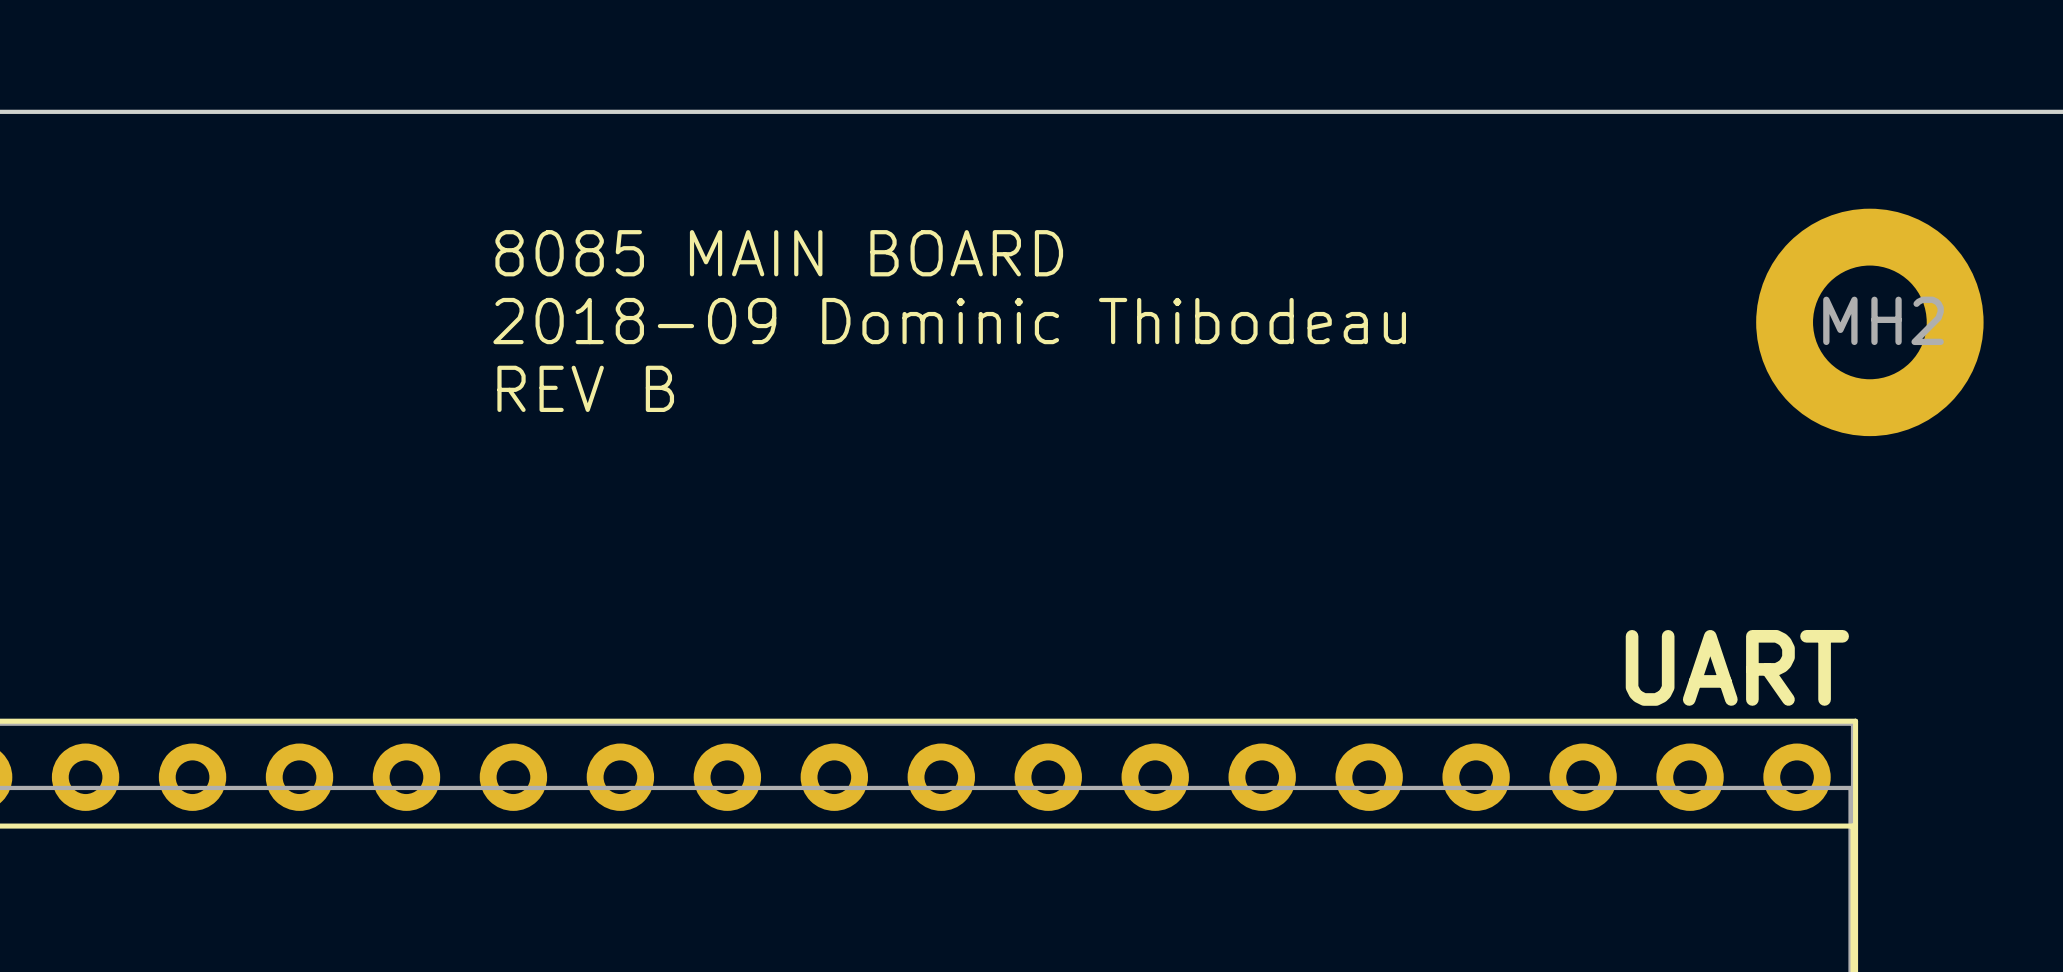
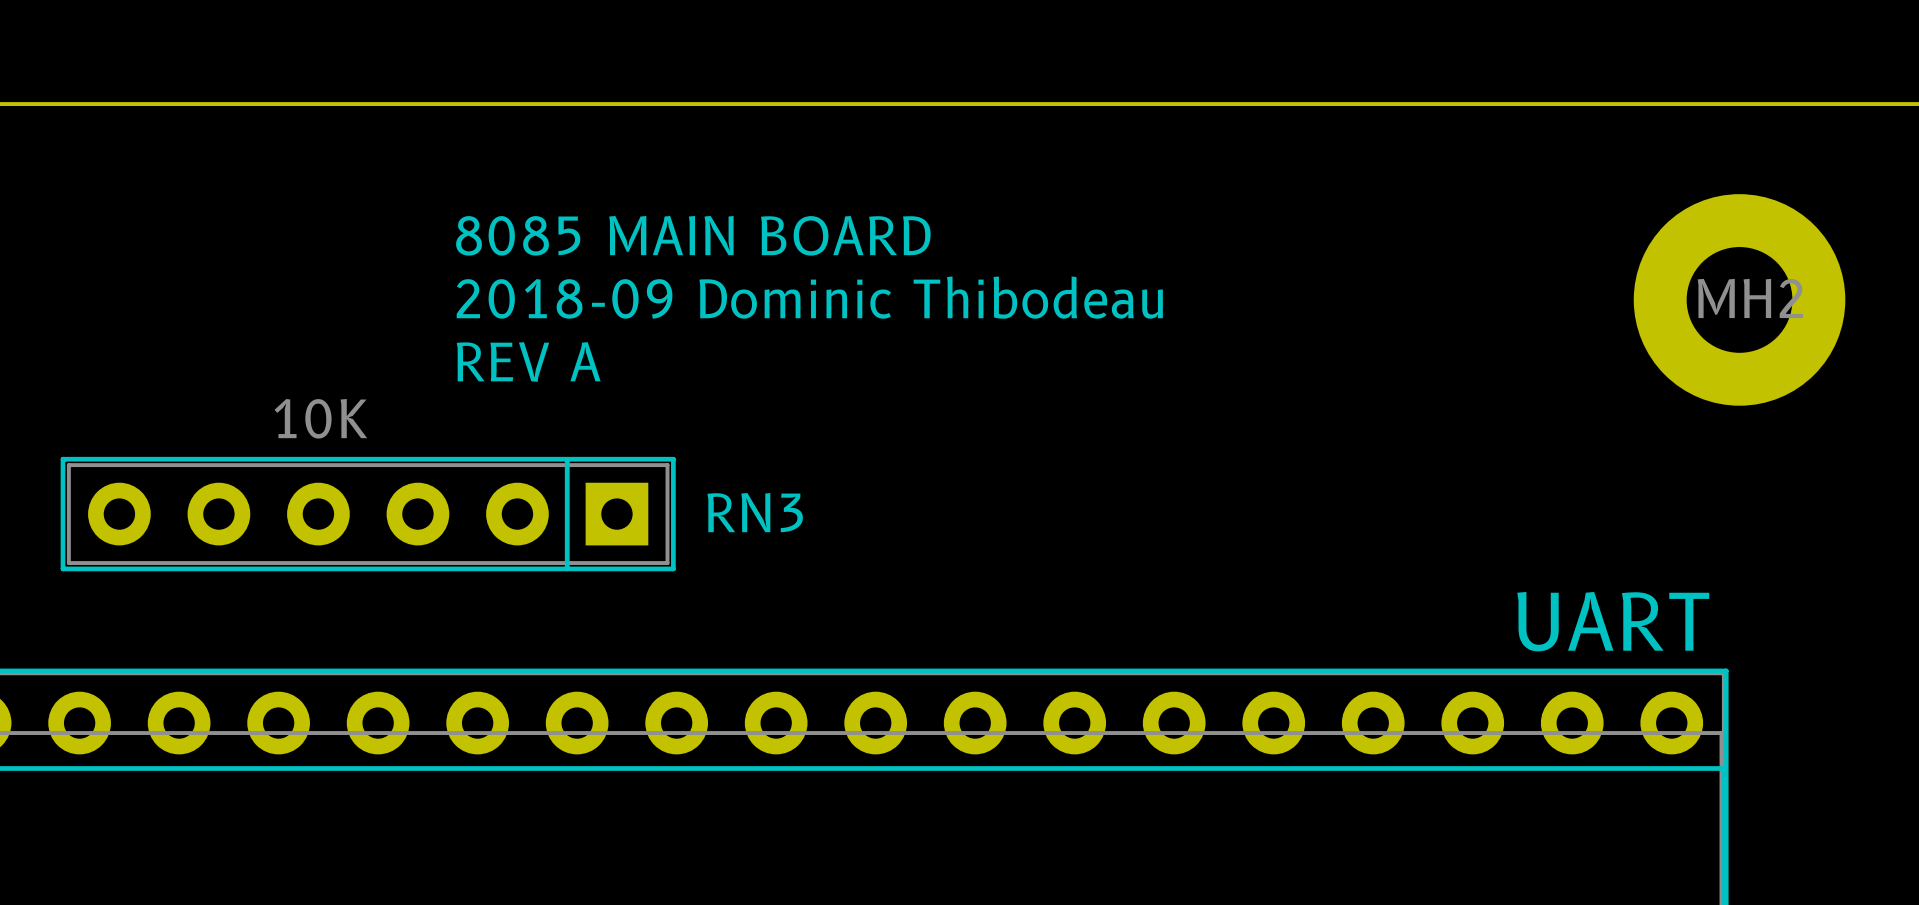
text: REV B (585, 388) -> REV A (528, 361)
RN3: none -> 10K (368, 514)

